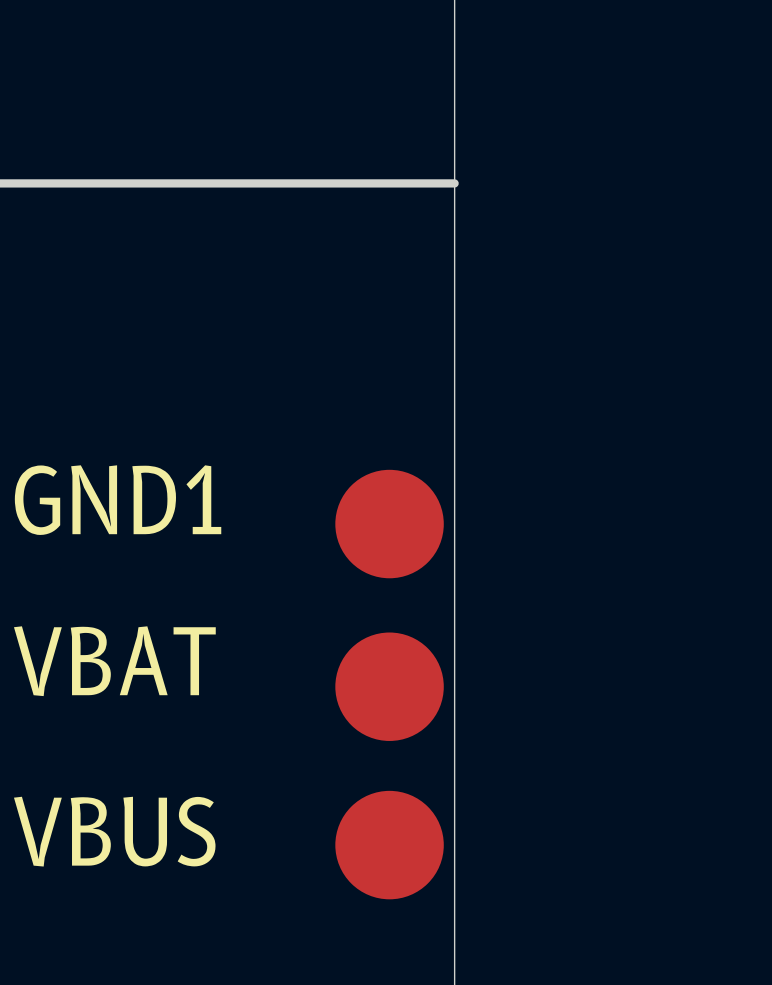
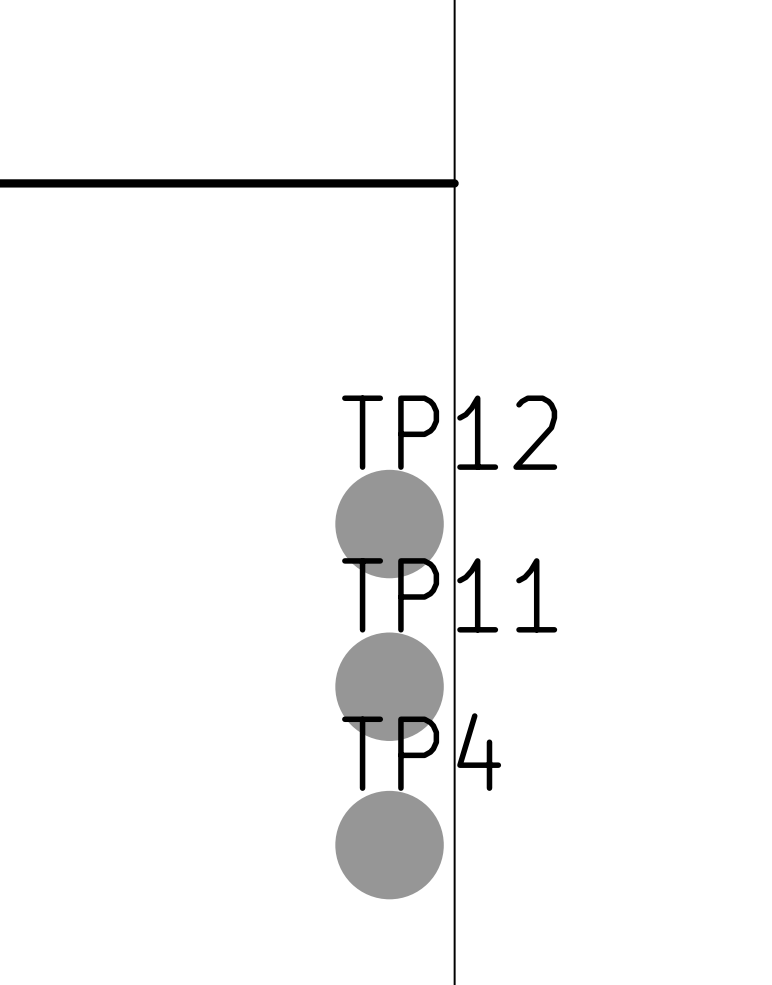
GND1 name: GND1 (118, 500) -> TP12 (449, 432)
VBAT name: VBAT (114, 661) -> TP11 (449, 595)
VBUS name: VBUS (114, 831) -> TP4 (421, 752)

